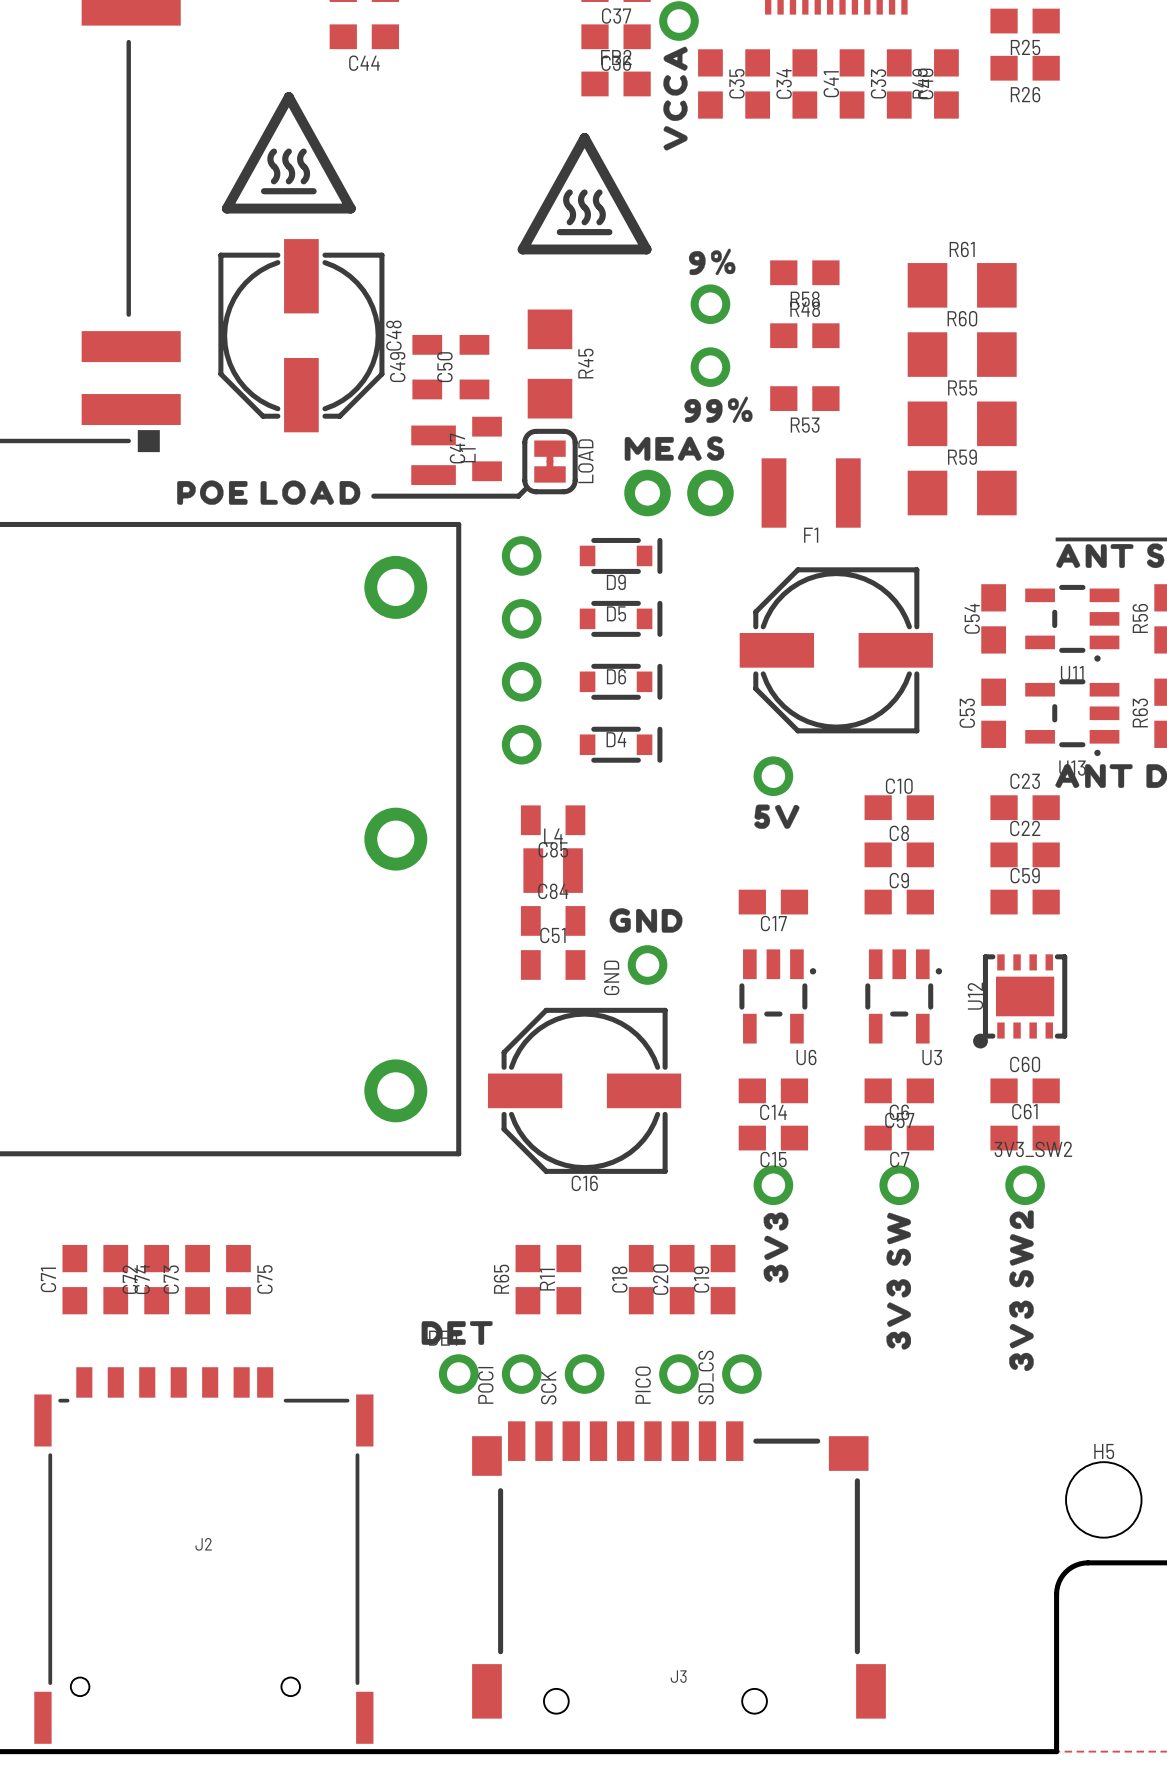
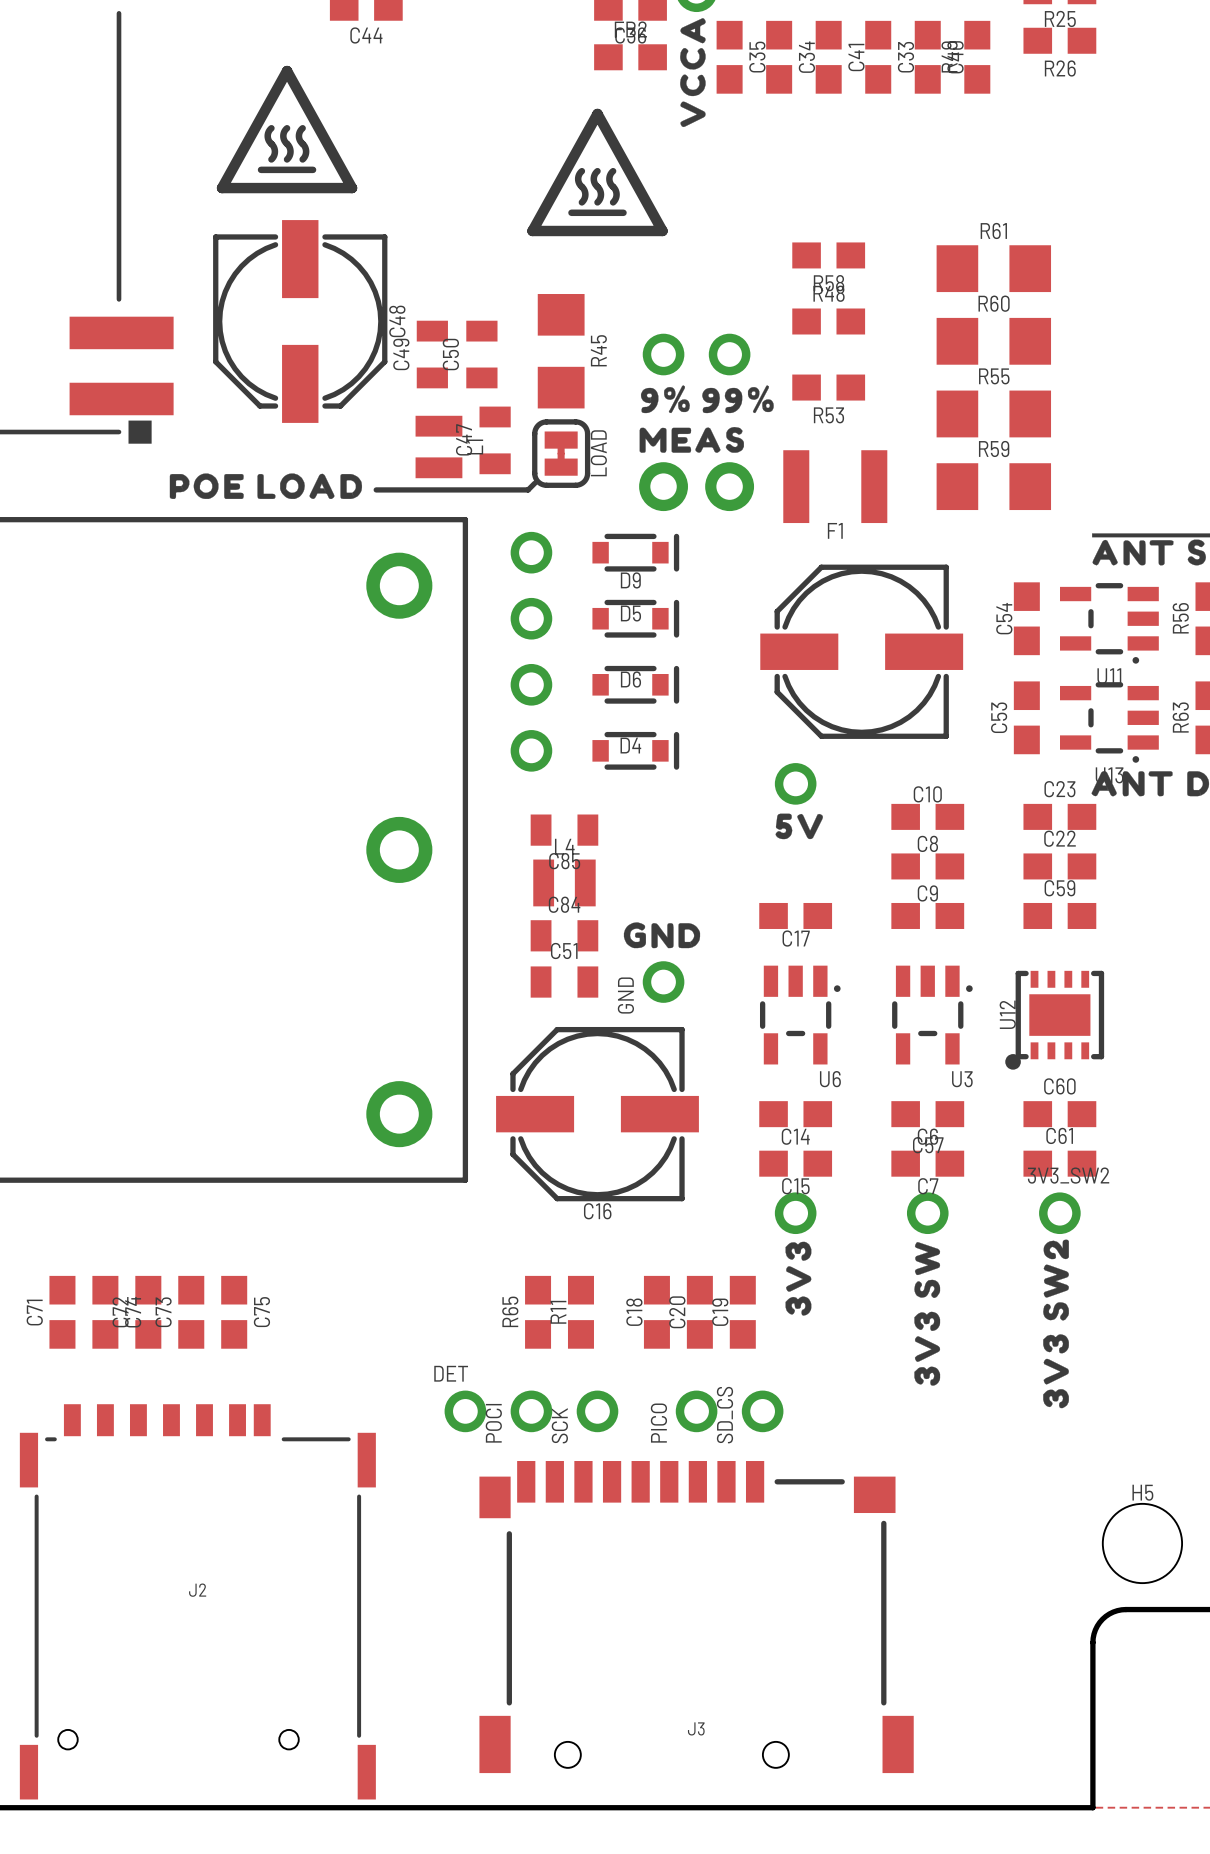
drawing position: (712, 261) -> (665, 399)
part position: (710, 304) -> (663, 354)
drawing: [421, 1321, 493, 1345] -> none

